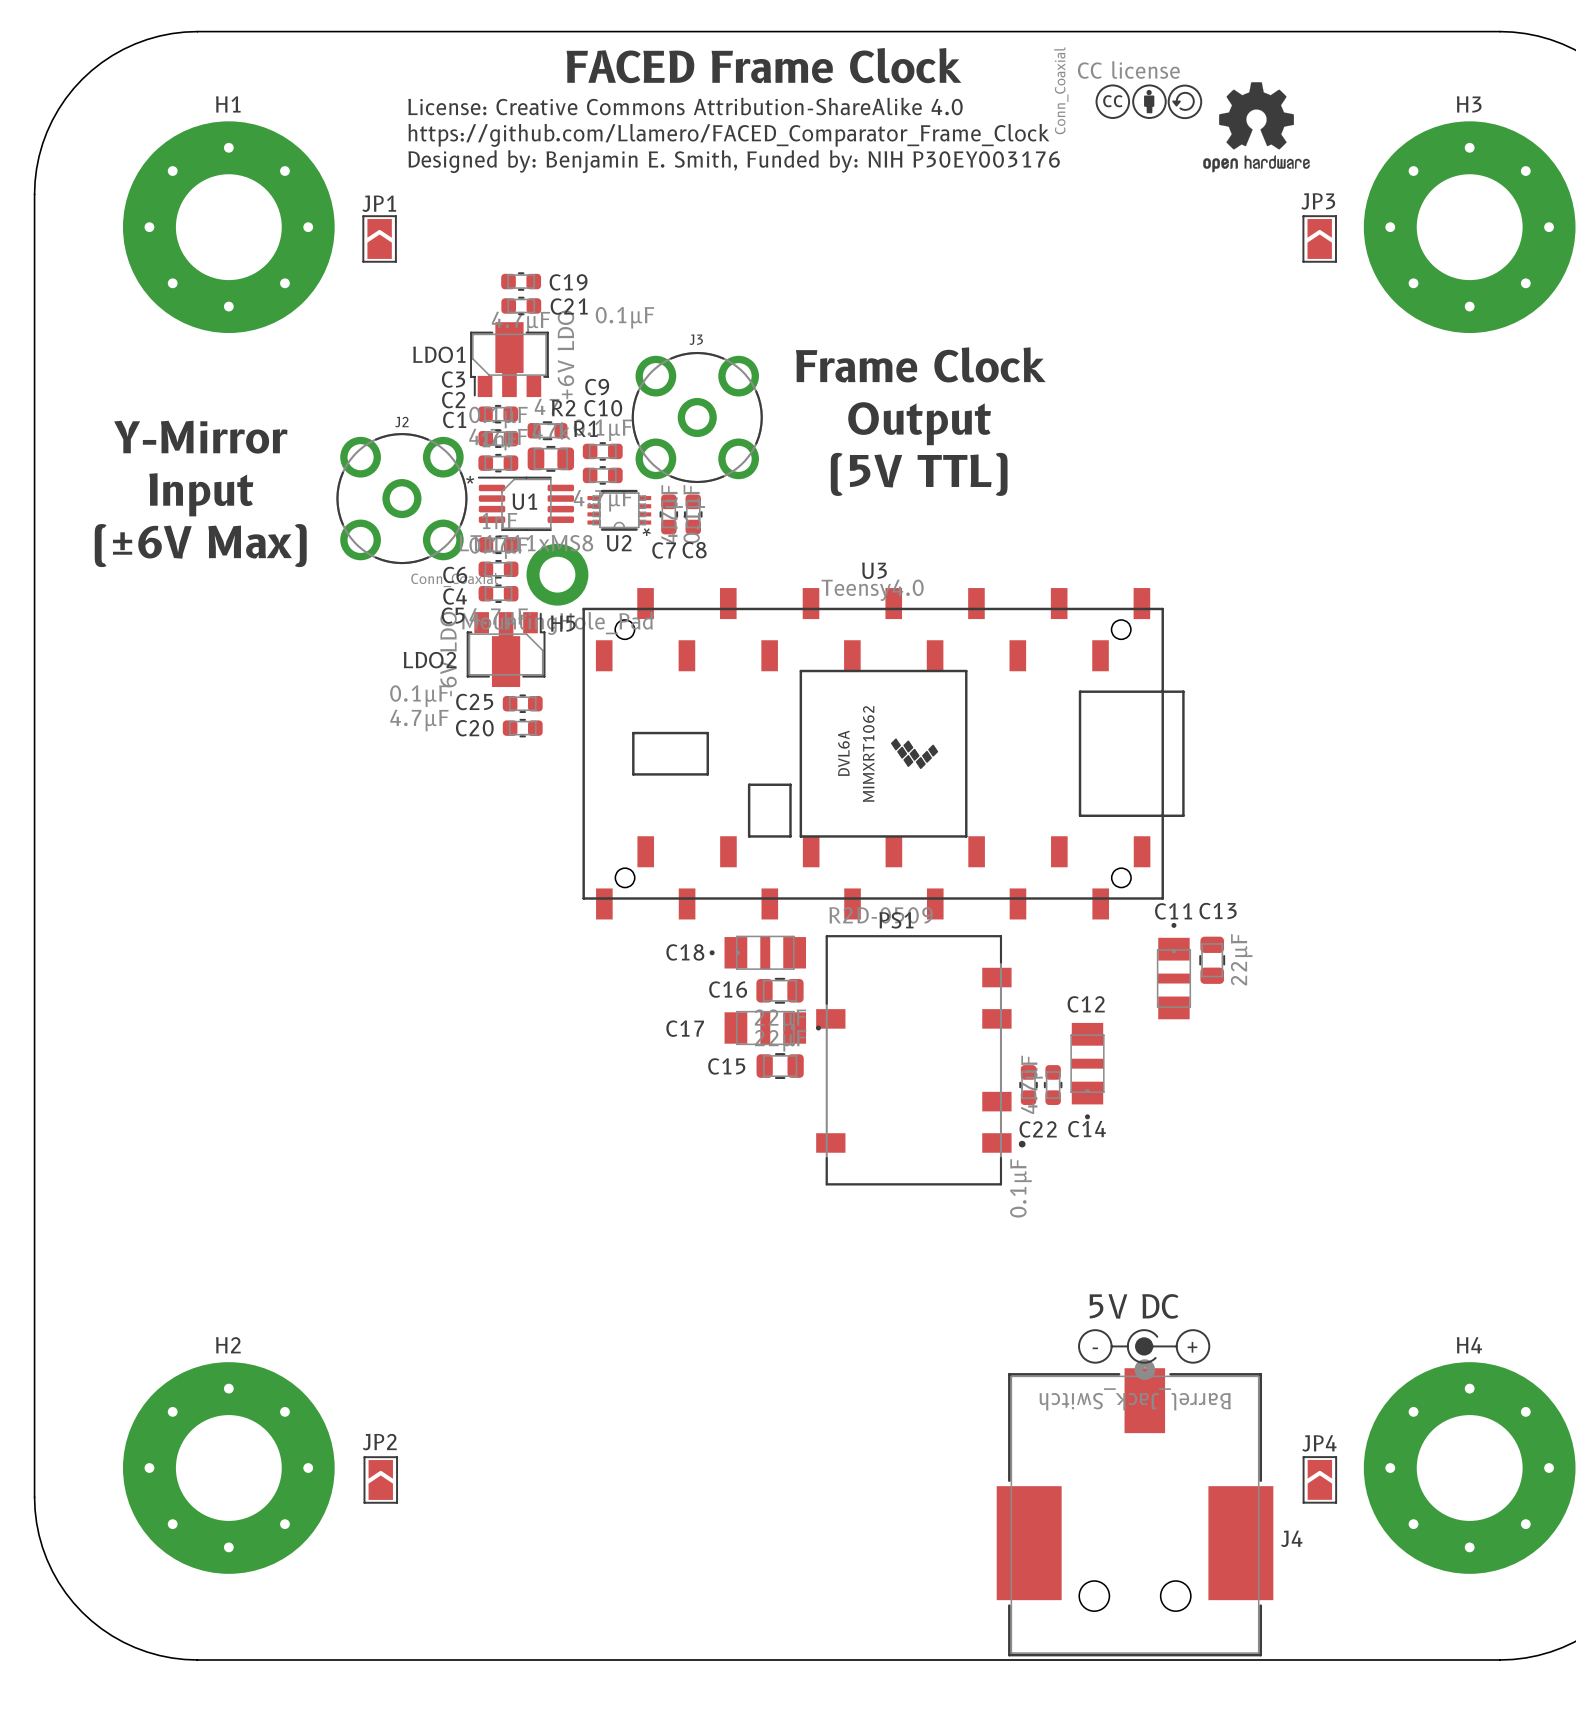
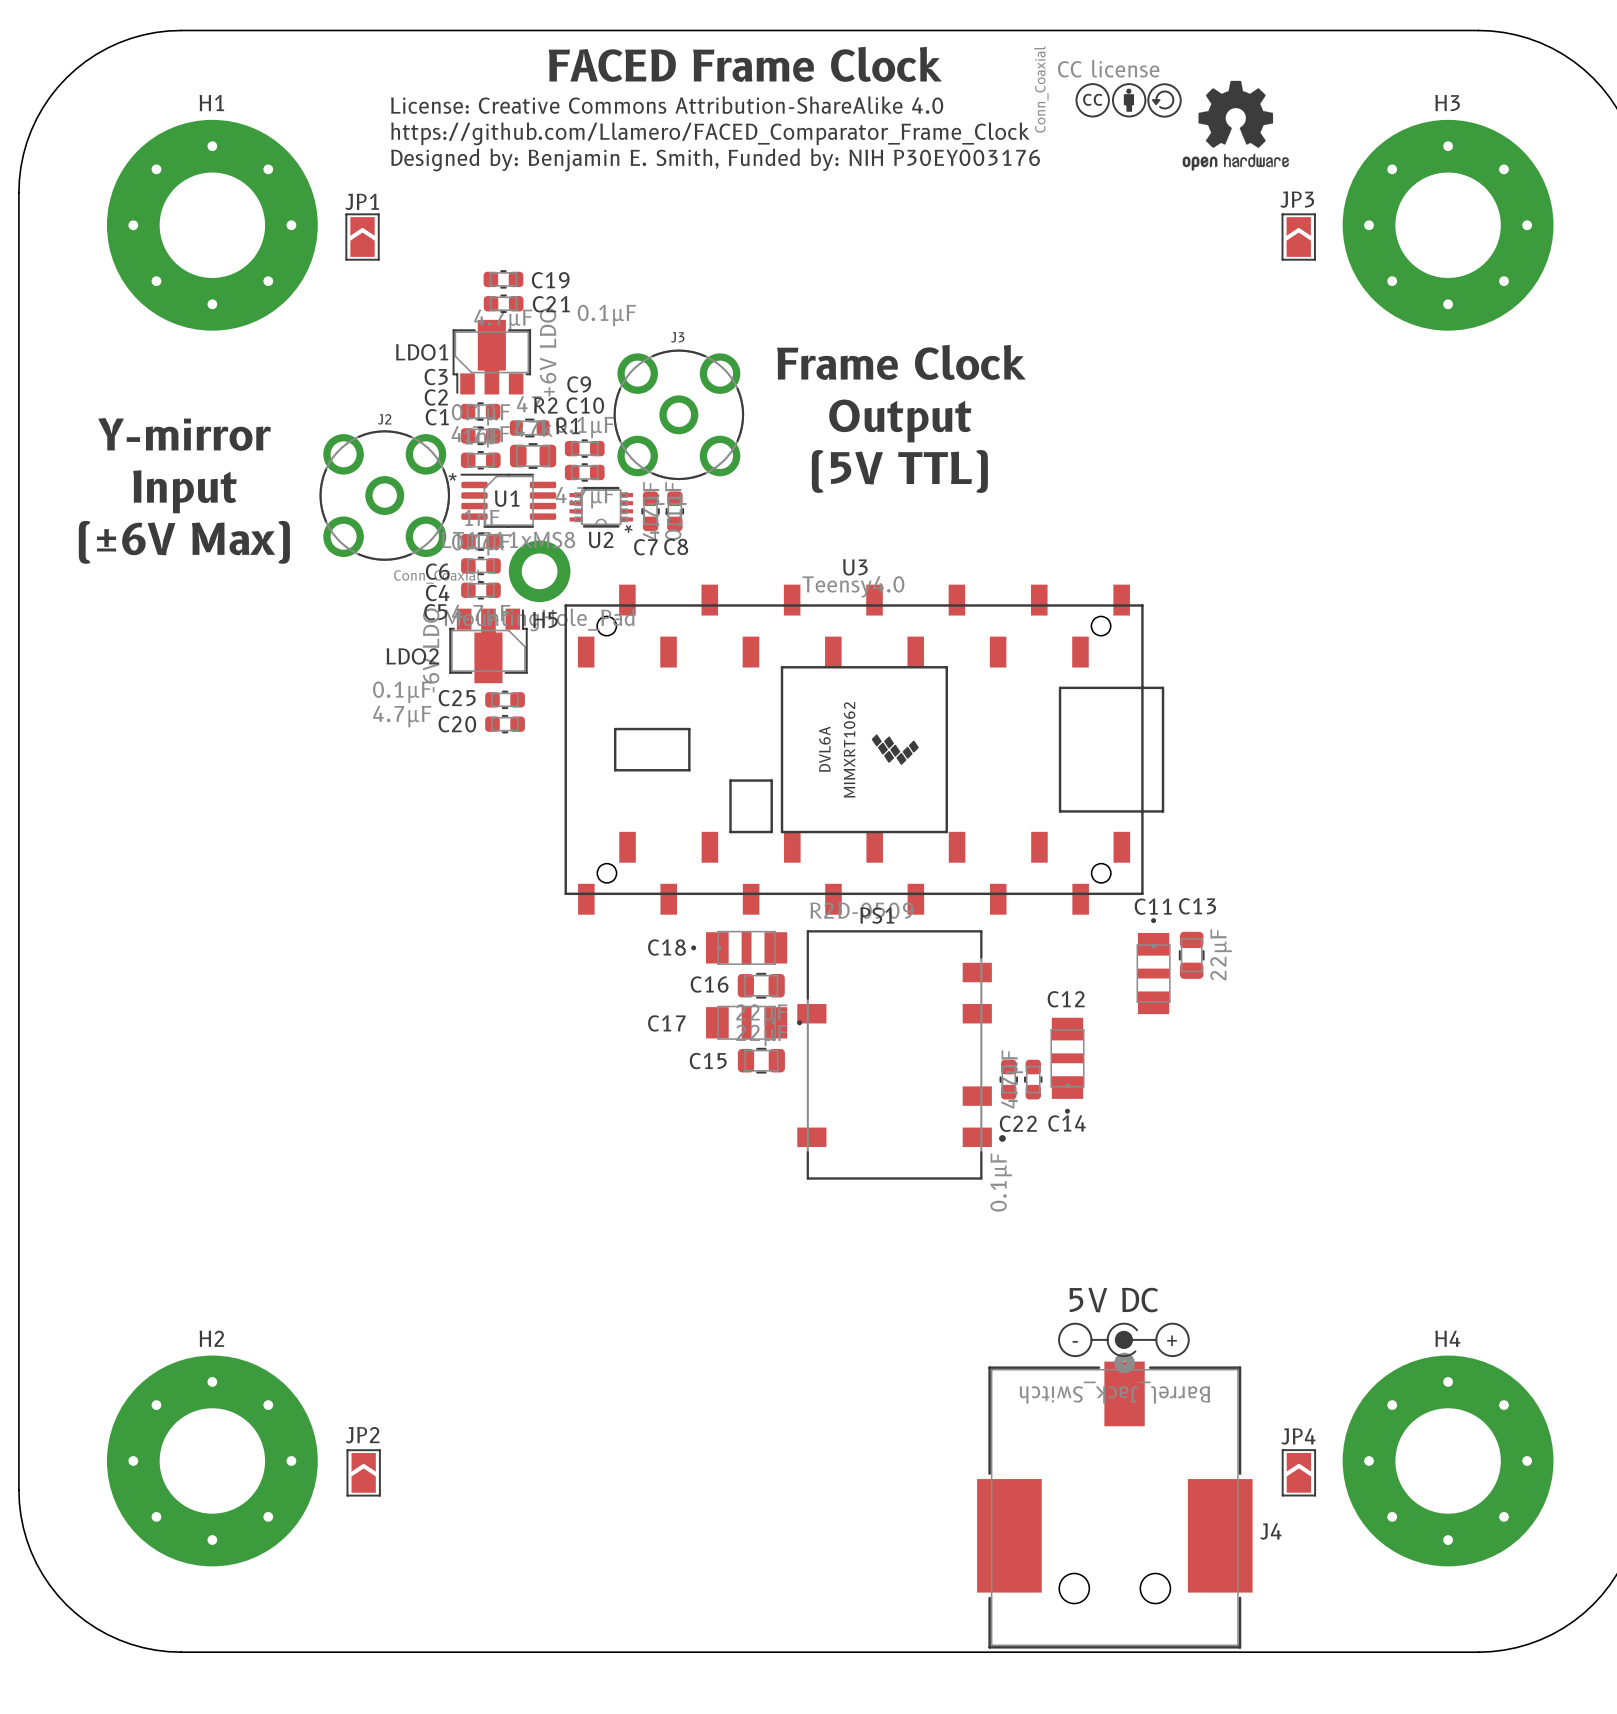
text: Y-Mirror (200, 437) -> Y-mirror (184, 434)

